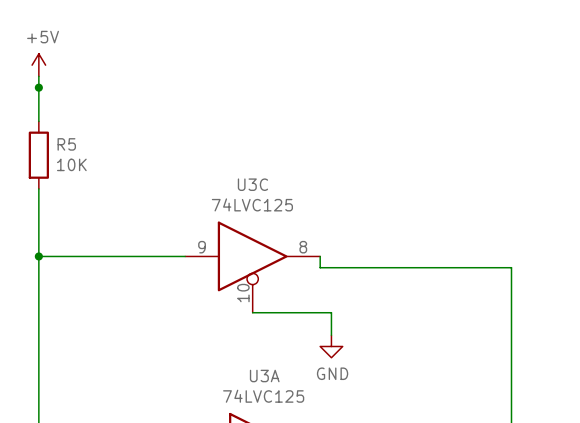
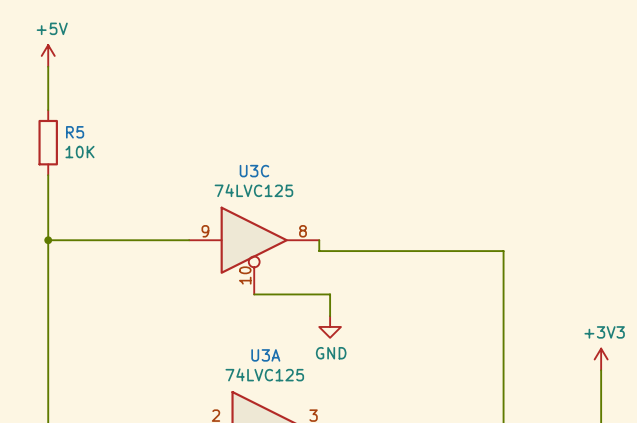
junction: (38, 87) -> none

